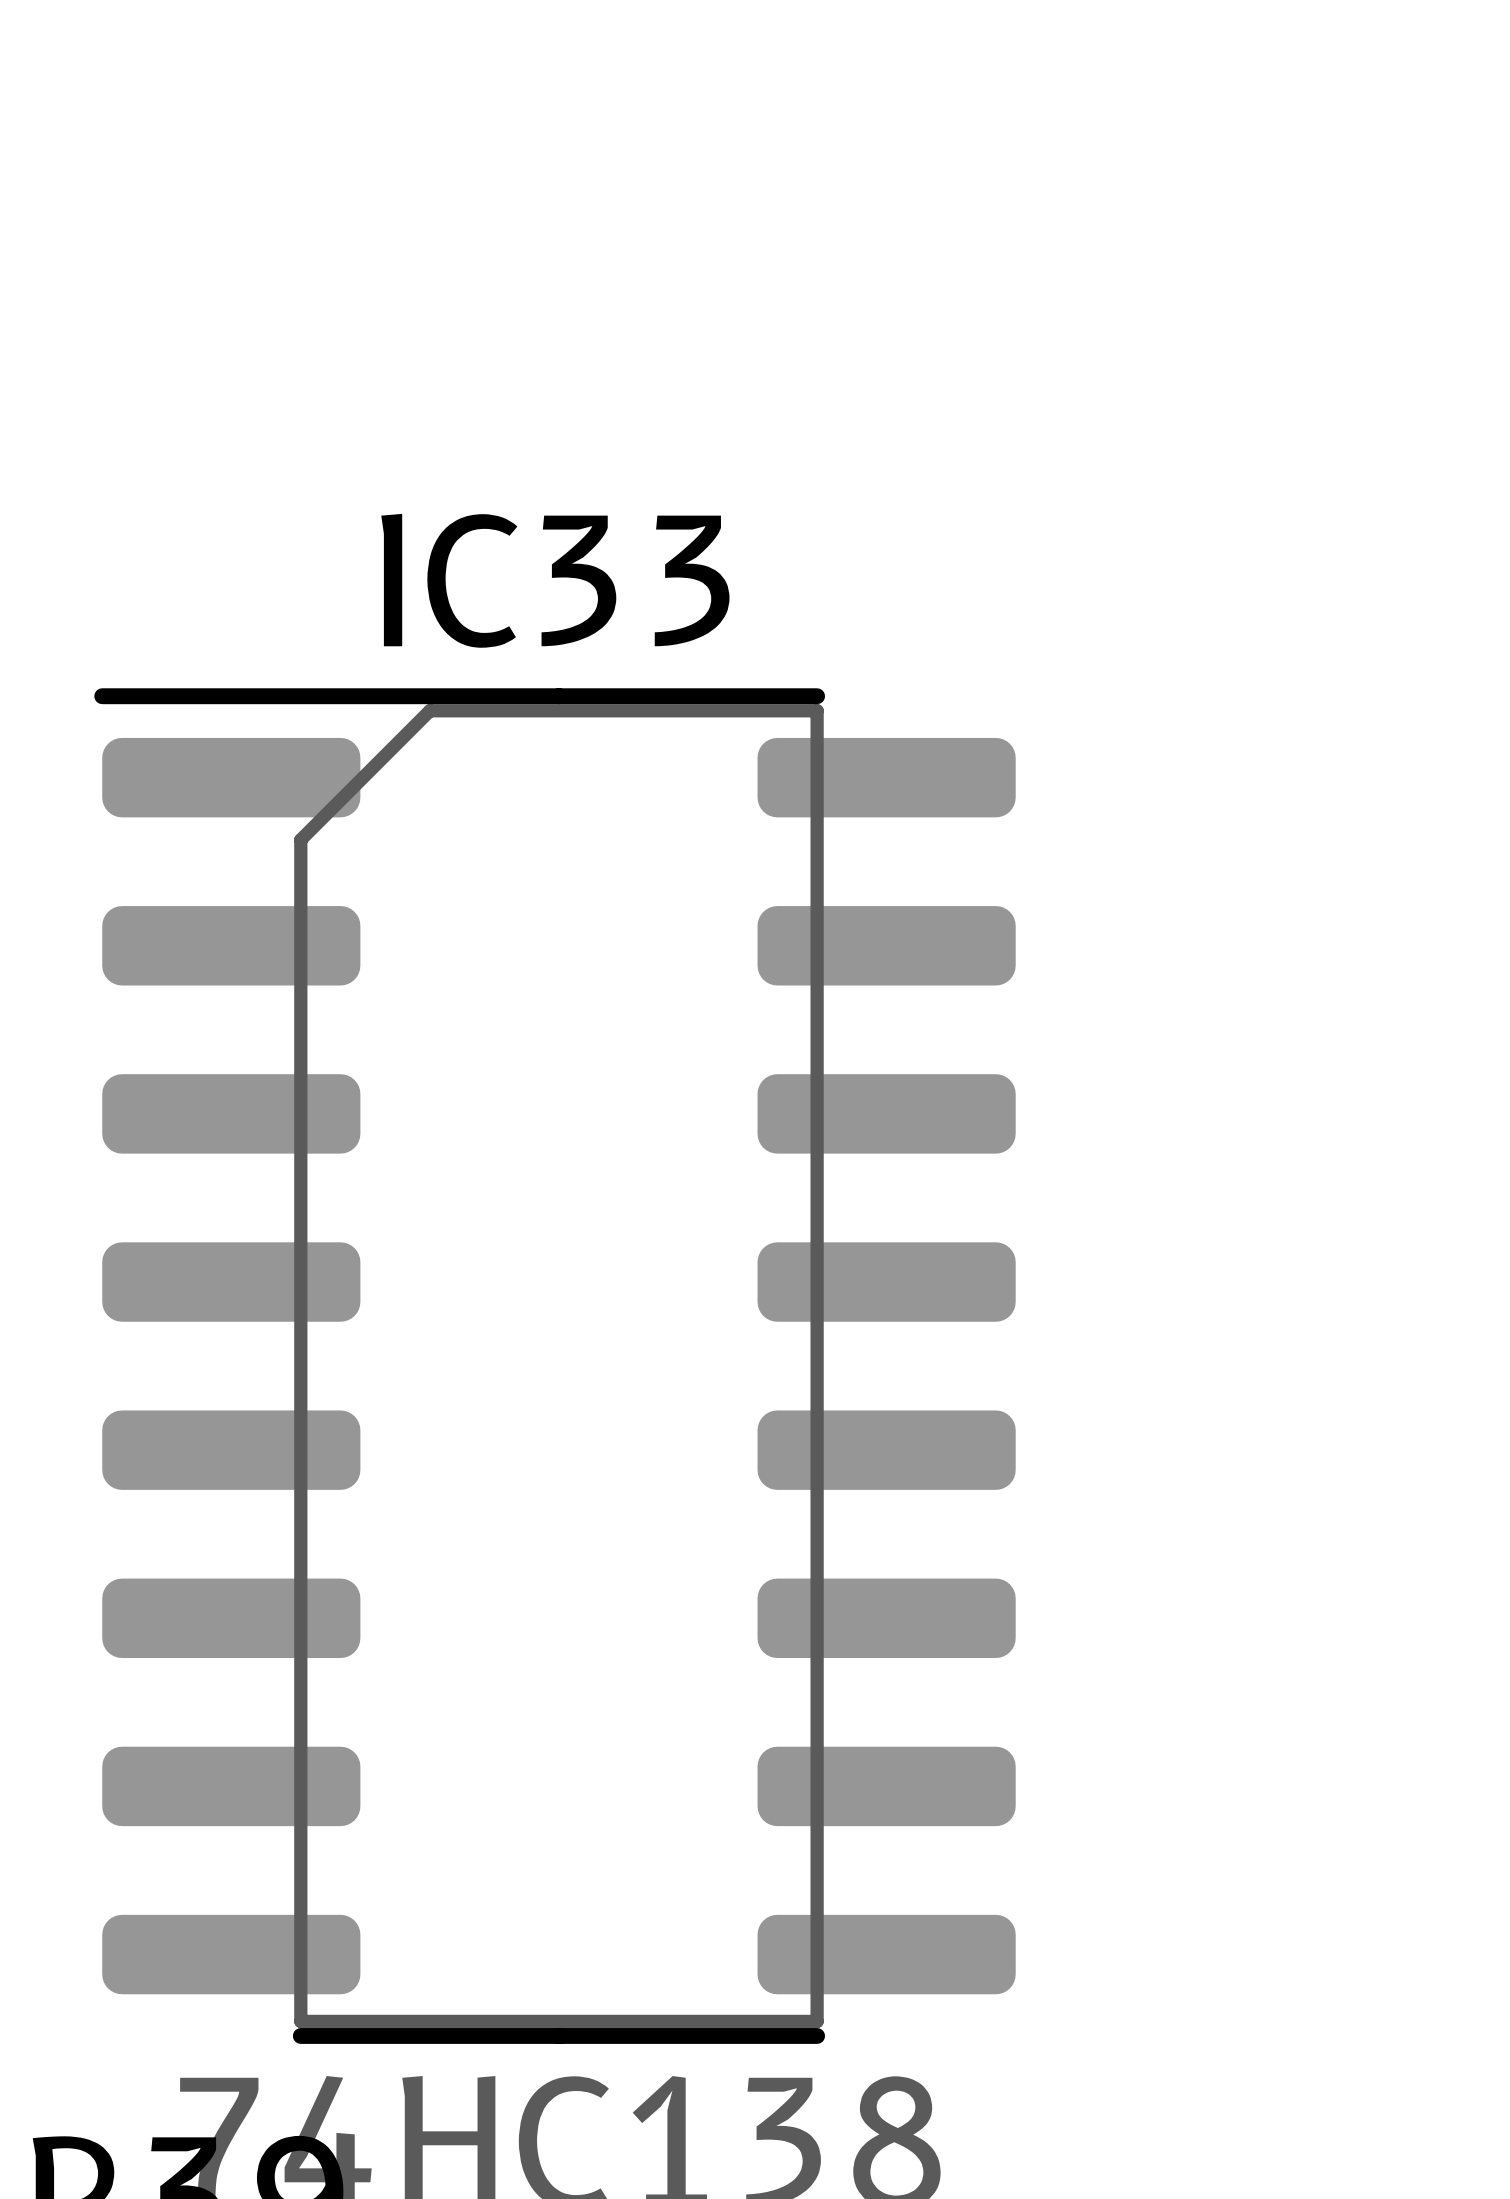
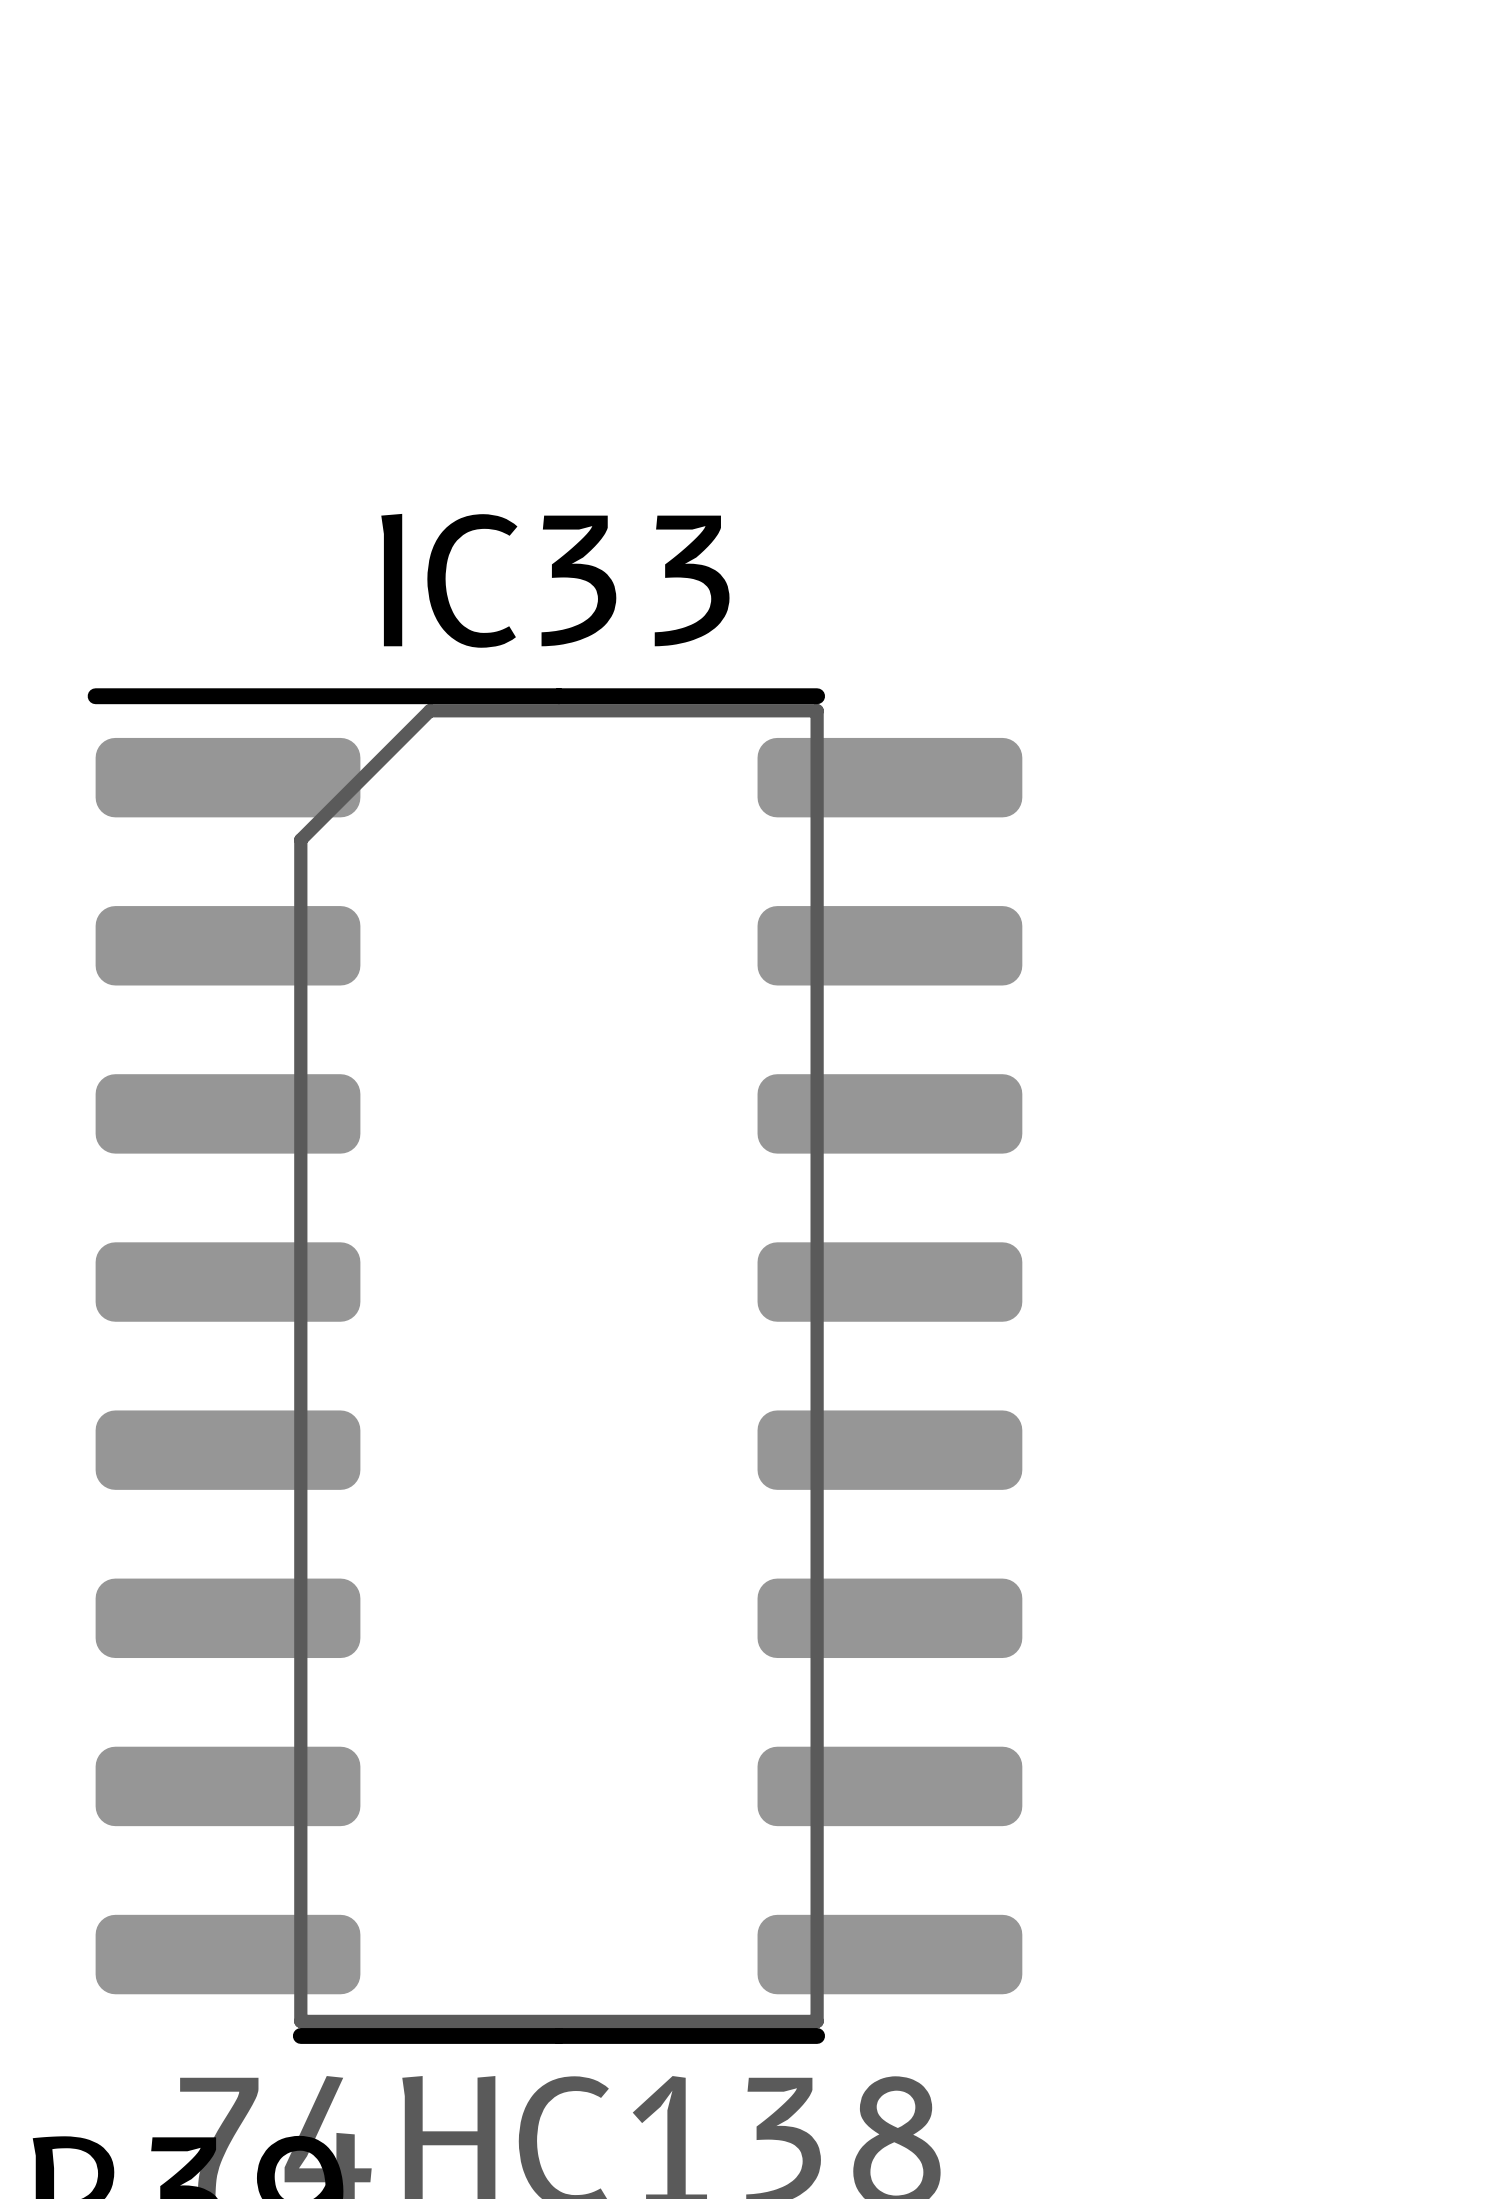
IC33 footprint: [94, 688, 1016, 2044] -> [87, 688, 1023, 2044]

